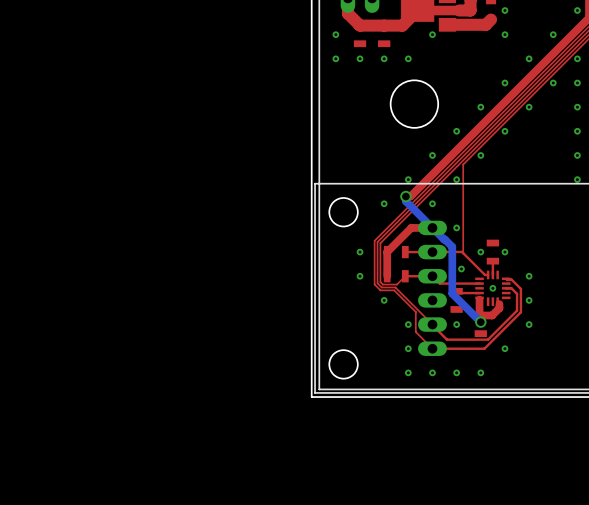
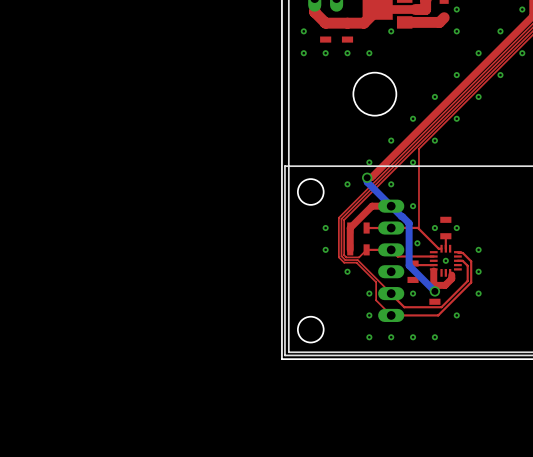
via: (577, 82) -> none
via: (577, 107) -> none
via: (577, 131) -> none
via: (577, 155) -> none
via: (577, 179) -> none

